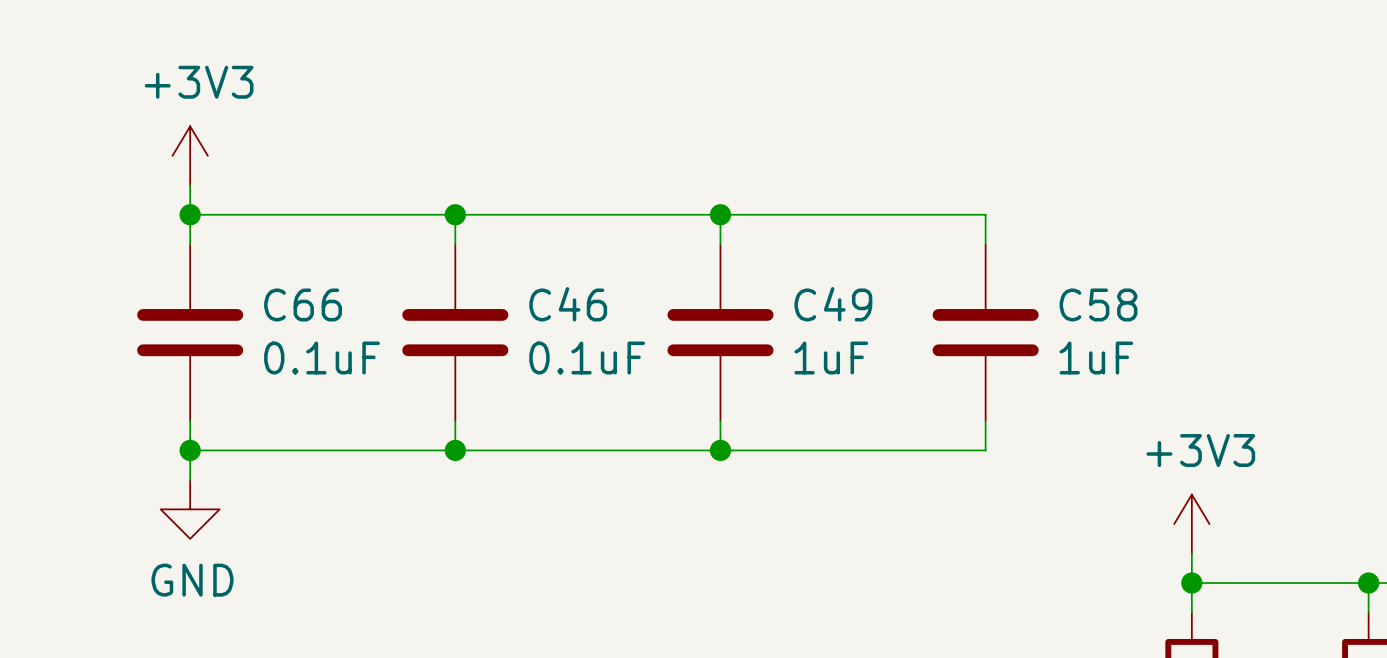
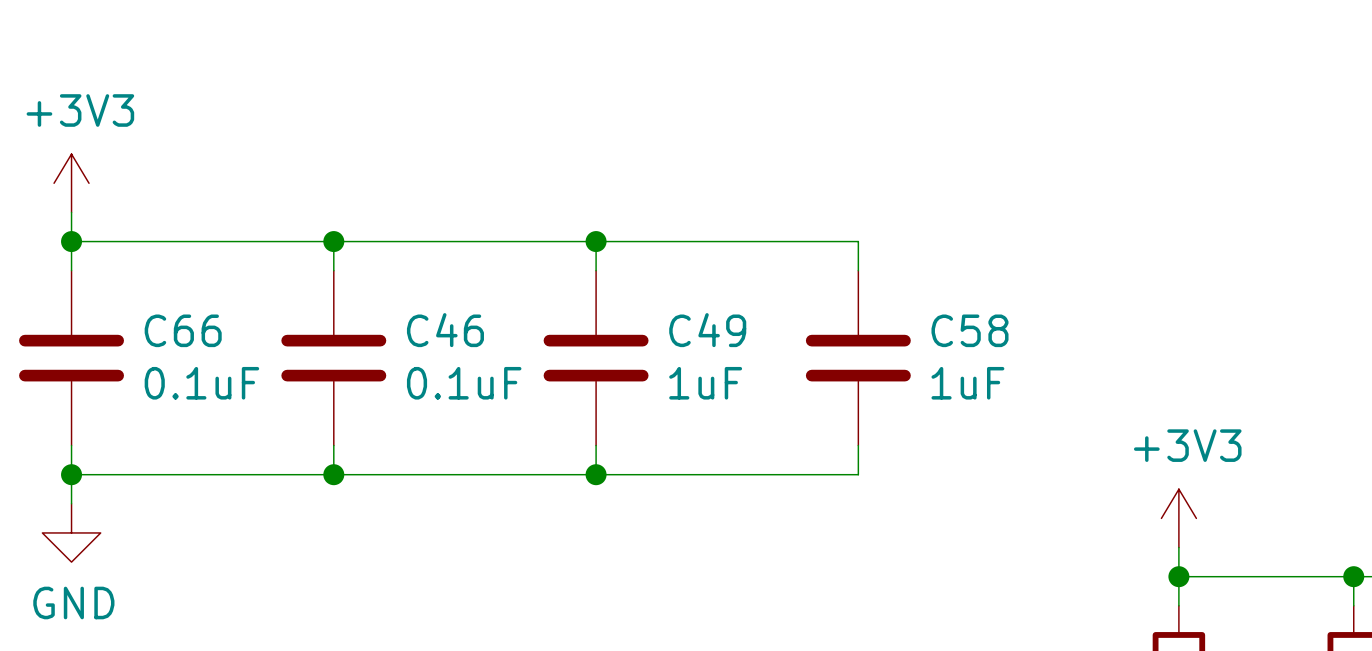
power symbol position: +3V3 (190, 155) -> +3V3 (71, 183)
wire: (190, 185) (190, 244) -> (71, 212) (71, 270)
wire: (190, 214) (985, 214) (985, 244) -> (71, 241) (858, 241) (858, 270)
junction: (190, 214) -> none
wire: (455, 214) (455, 244) -> (333, 241) (333, 270)
junction: (455, 214) -> none
wire: (720, 214) (720, 244) -> (596, 241) (596, 270)
junction: (720, 214) -> none
junction: none -> (71, 241)
junction: none -> (333, 241)
junction: none -> (596, 241)
C66 position: (190, 332) -> (71, 358)
C46 position: (455, 332) -> (333, 358)
C49 position: (720, 332) -> (596, 358)
C58 position: (985, 332) -> (858, 358)
wire: (190, 420) (190, 479) -> (71, 445) (71, 503)
wire: (455, 420) (455, 450) -> (333, 445) (333, 474)
wire: (720, 420) (720, 450) -> (596, 445) (596, 474)
wire: (985, 420) (985, 450) (190, 450) -> (858, 445) (858, 474) (71, 474)
junction: (190, 450) -> none
junction: (455, 450) -> none
junction: (720, 450) -> none
junction: none -> (71, 474)
junction: none -> (333, 474)
junction: none -> (596, 474)
power symbol position: GND (190, 509) -> GND (71, 532)

